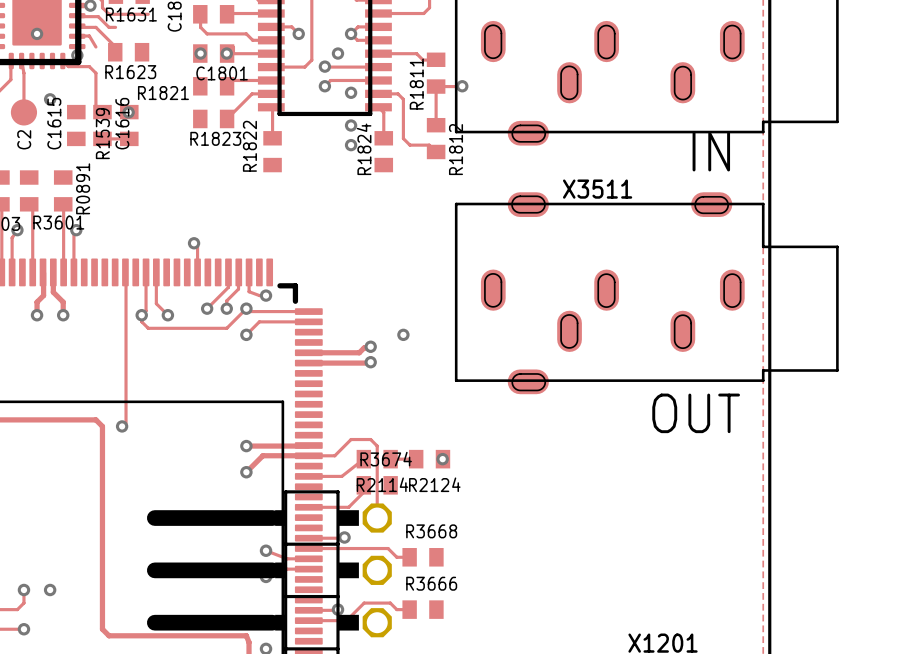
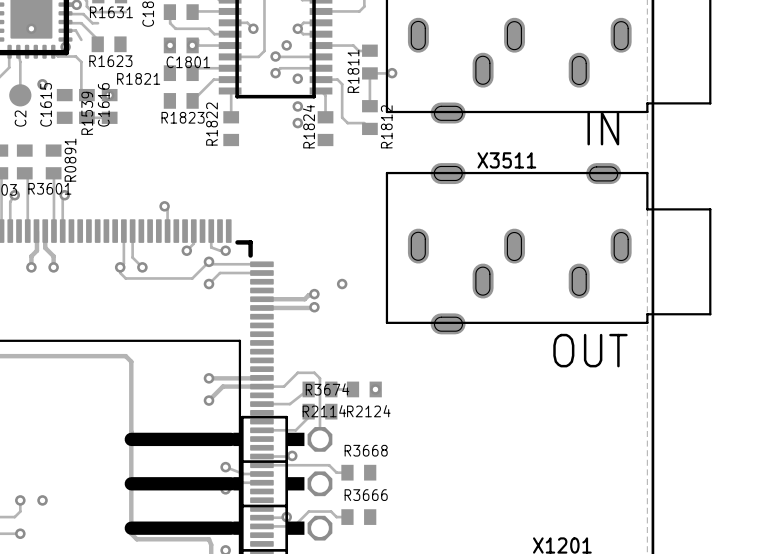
track: (125, 272) (126, 426) (122, 426) -> none
track: (238, 272) (238, 289) (226, 300) (226, 308) -> none
track: (220, 295) (207, 308) -> none
via: none -> (186, 250)
via: (207, 308) -> none
via: (226, 308) -> none
track: (95, 419) (102, 426) (102, 629) (109, 635) (161, 635) -> (81, 356) (125, 356) (131, 361) (131, 533) (136, 539)
via: (122, 426) -> none

